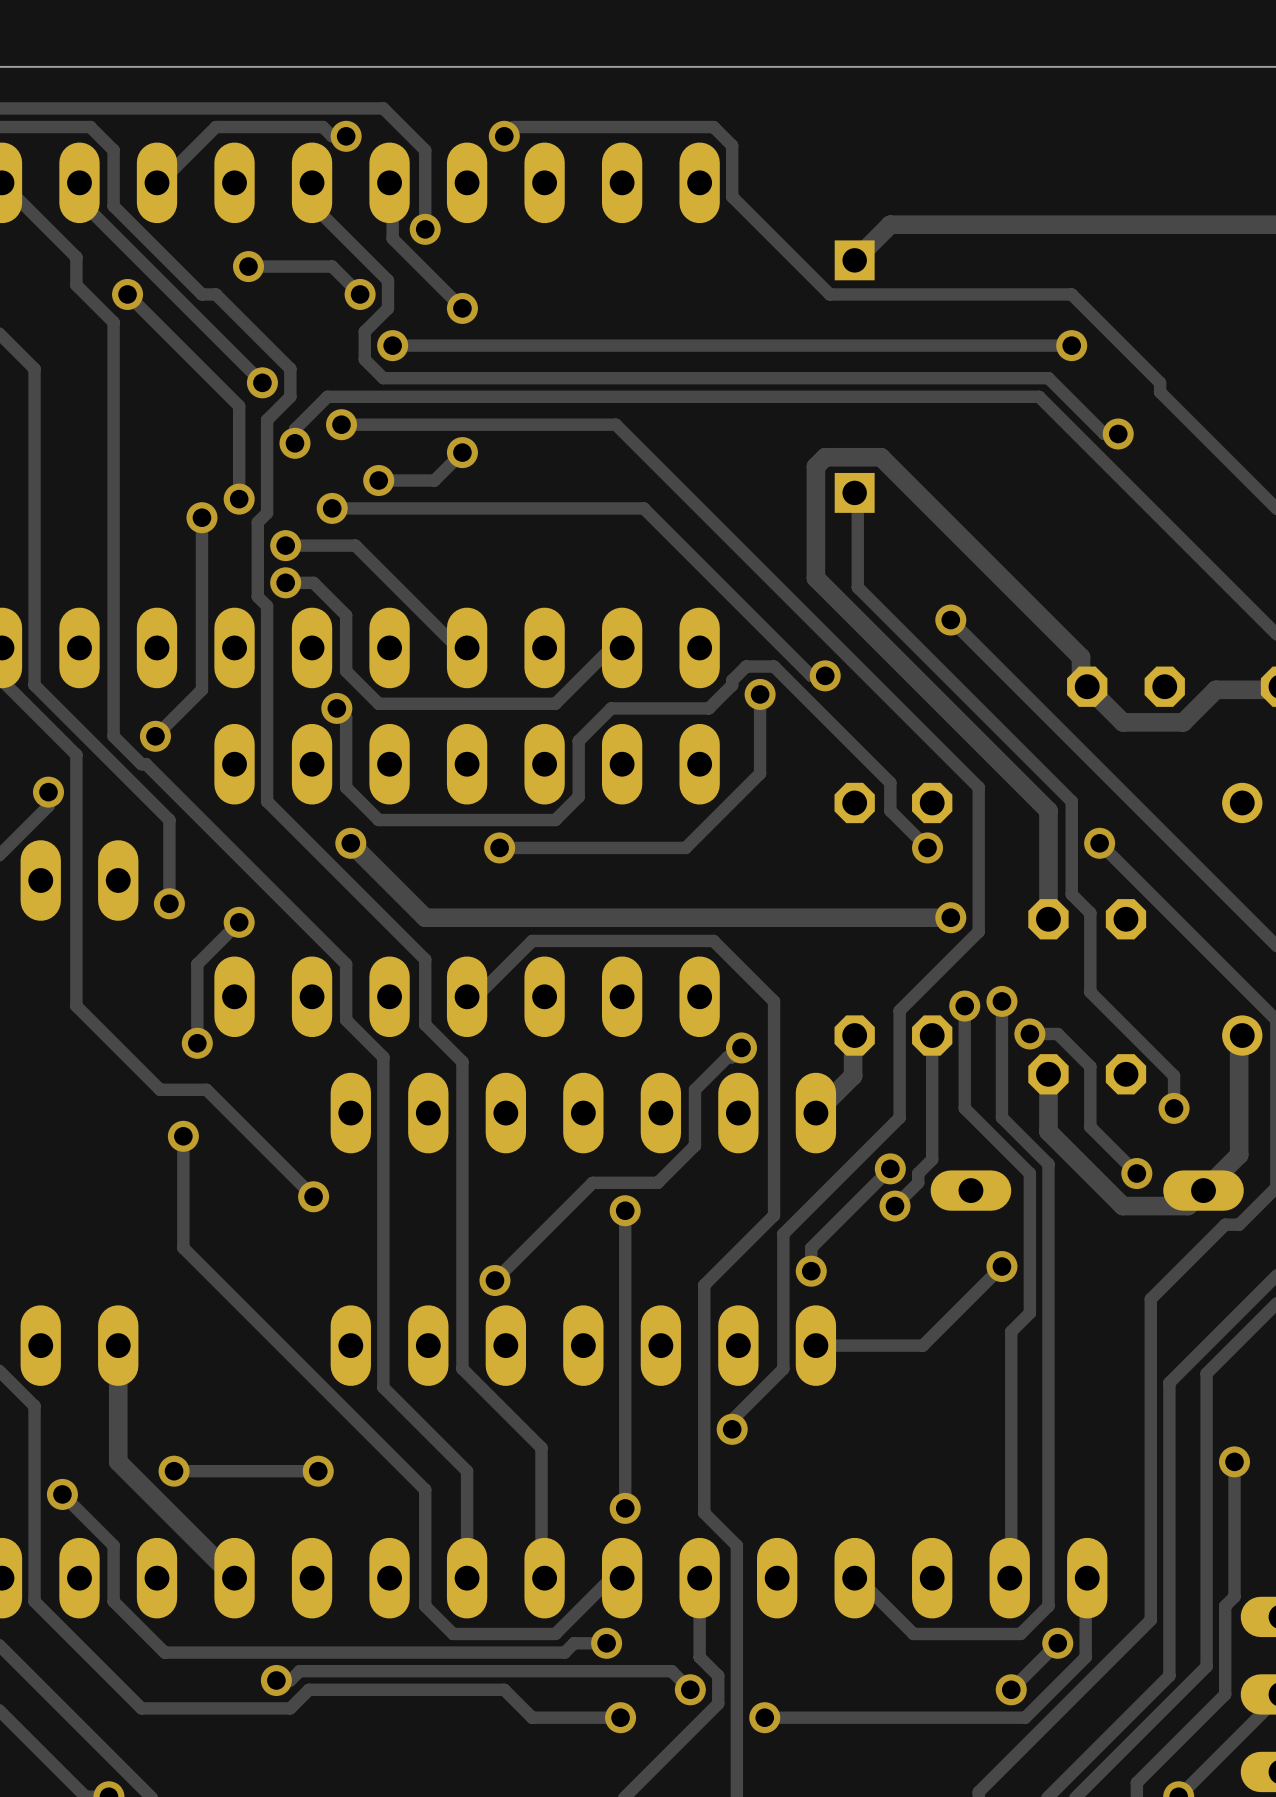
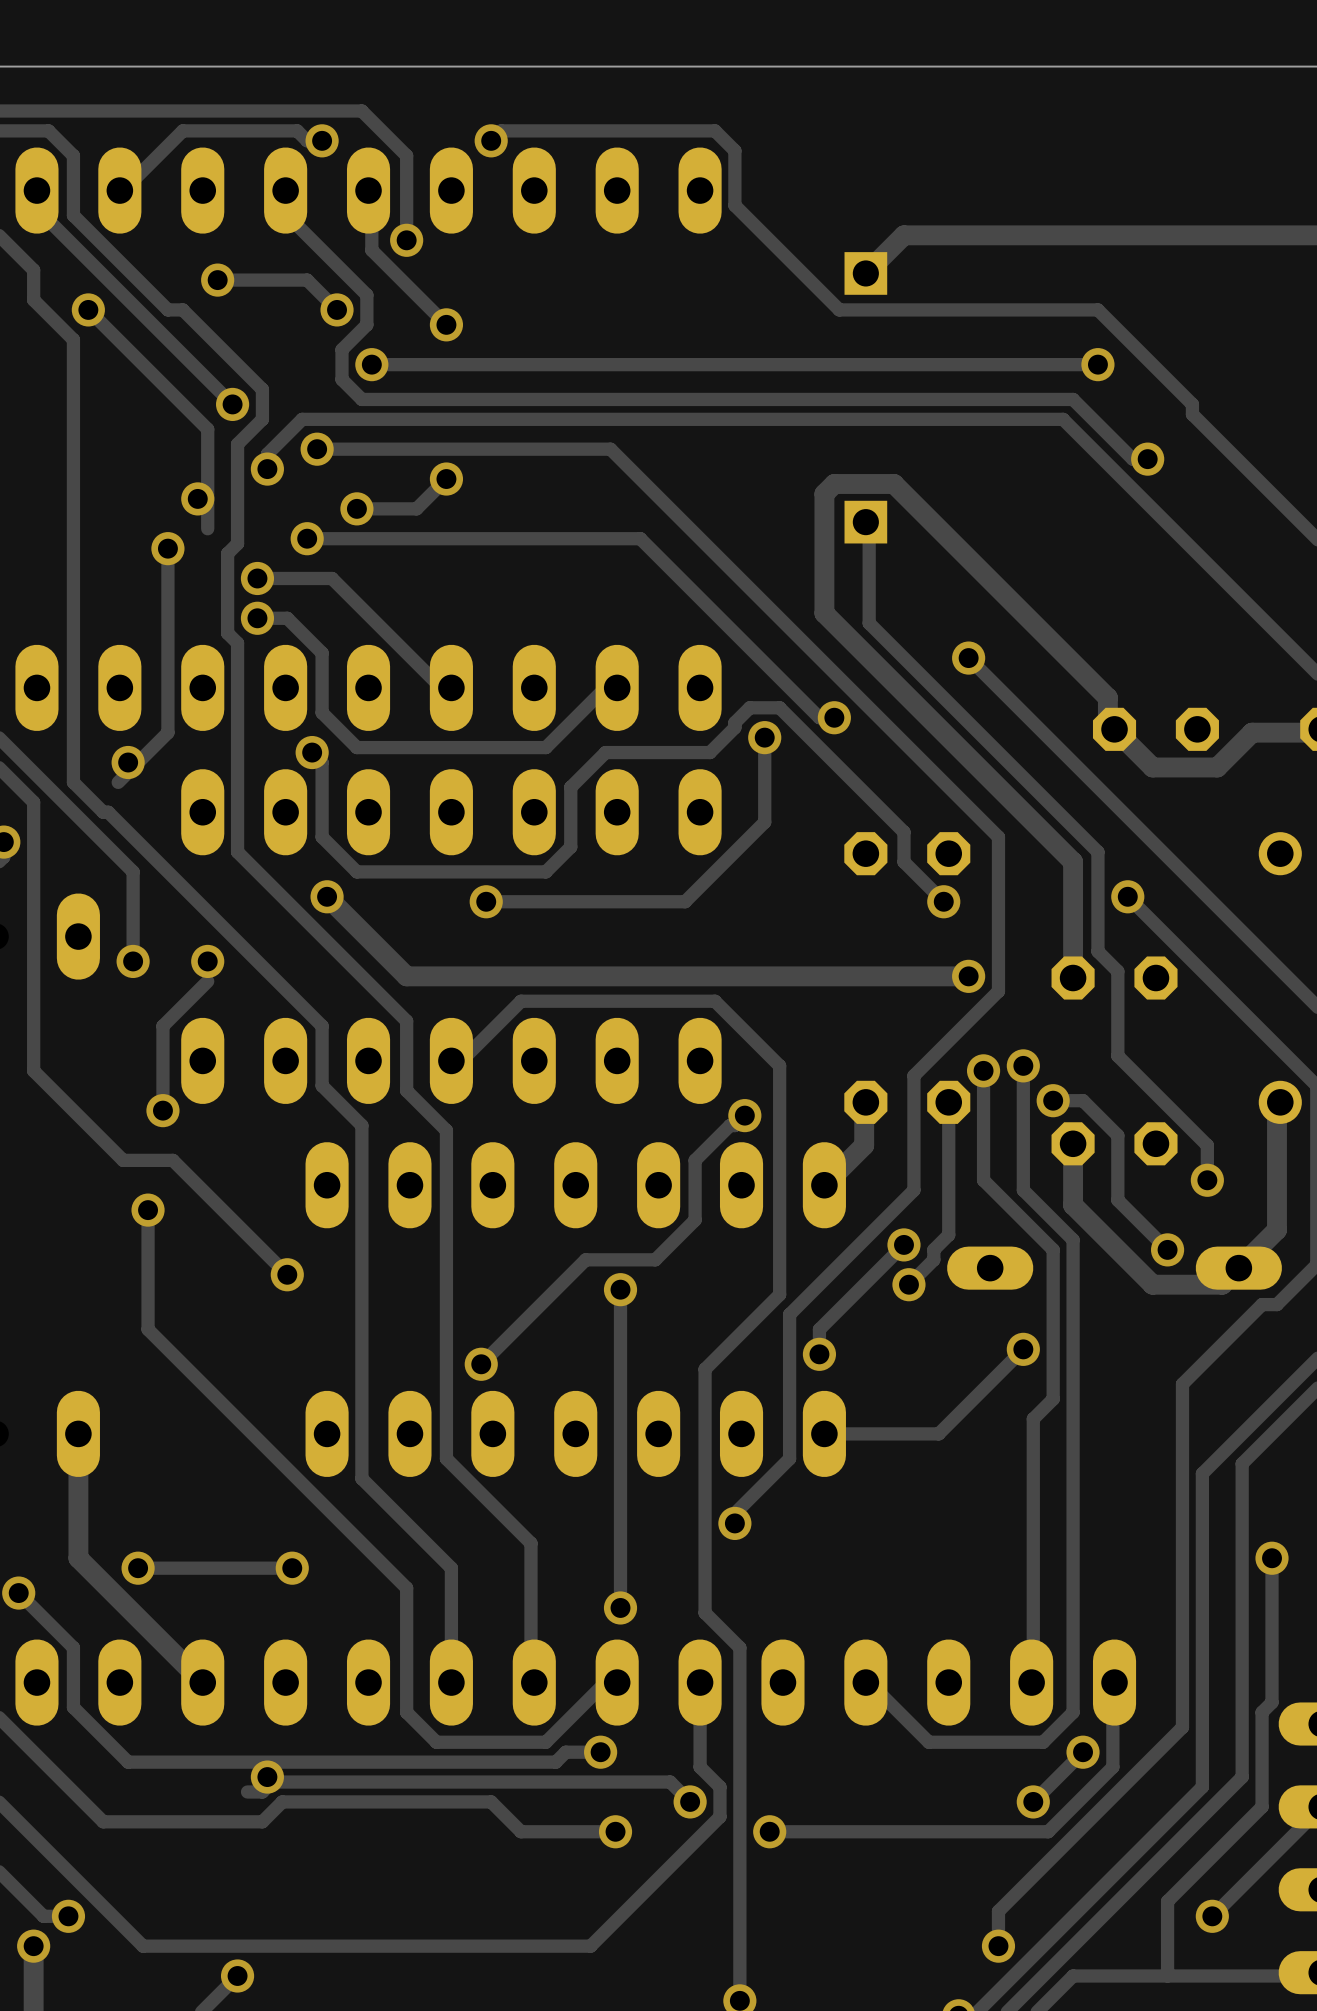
via position: (239, 499) -> (197, 498)
via position: (155, 736) -> (128, 762)
via position: (239, 922) -> (207, 961)
via position: (276, 1680) -> (267, 1777)

